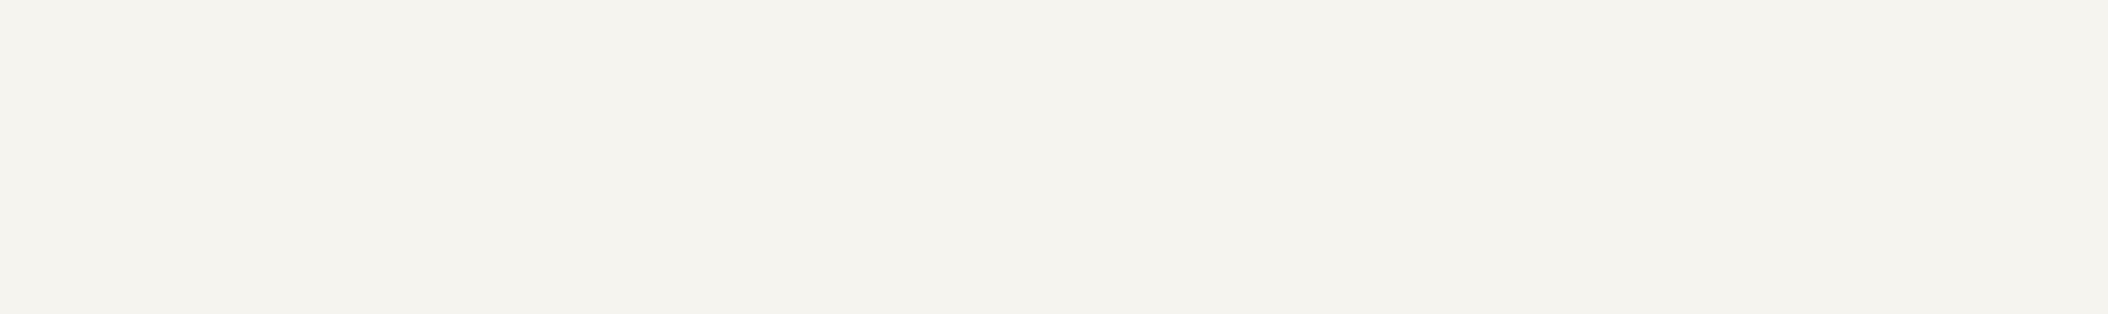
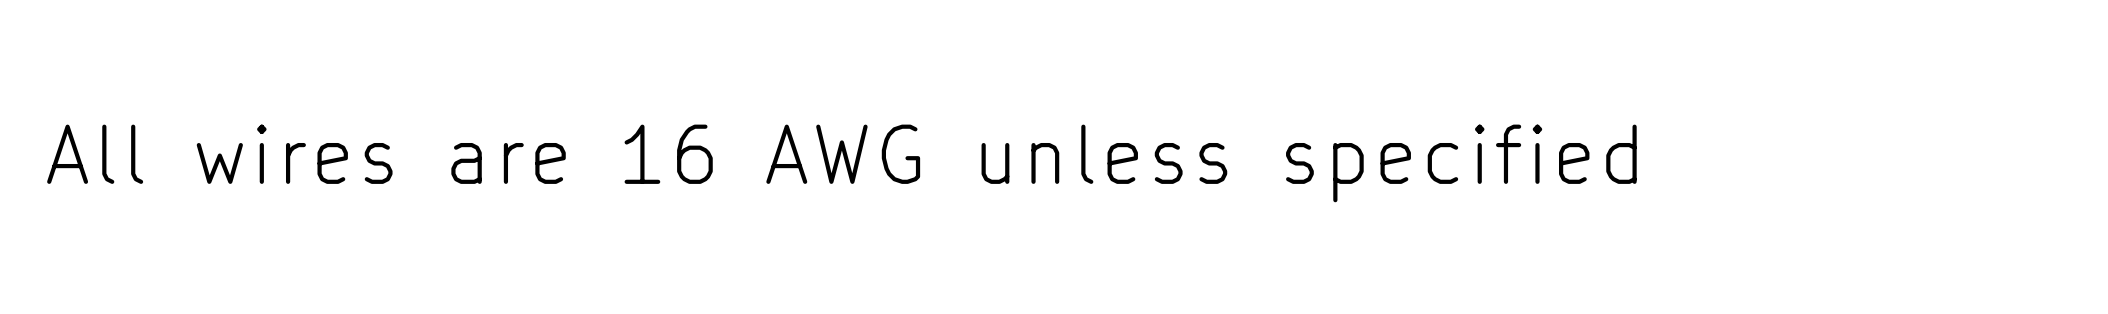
text: none -> All wires are 16 AWG unless specified (841, 163)

